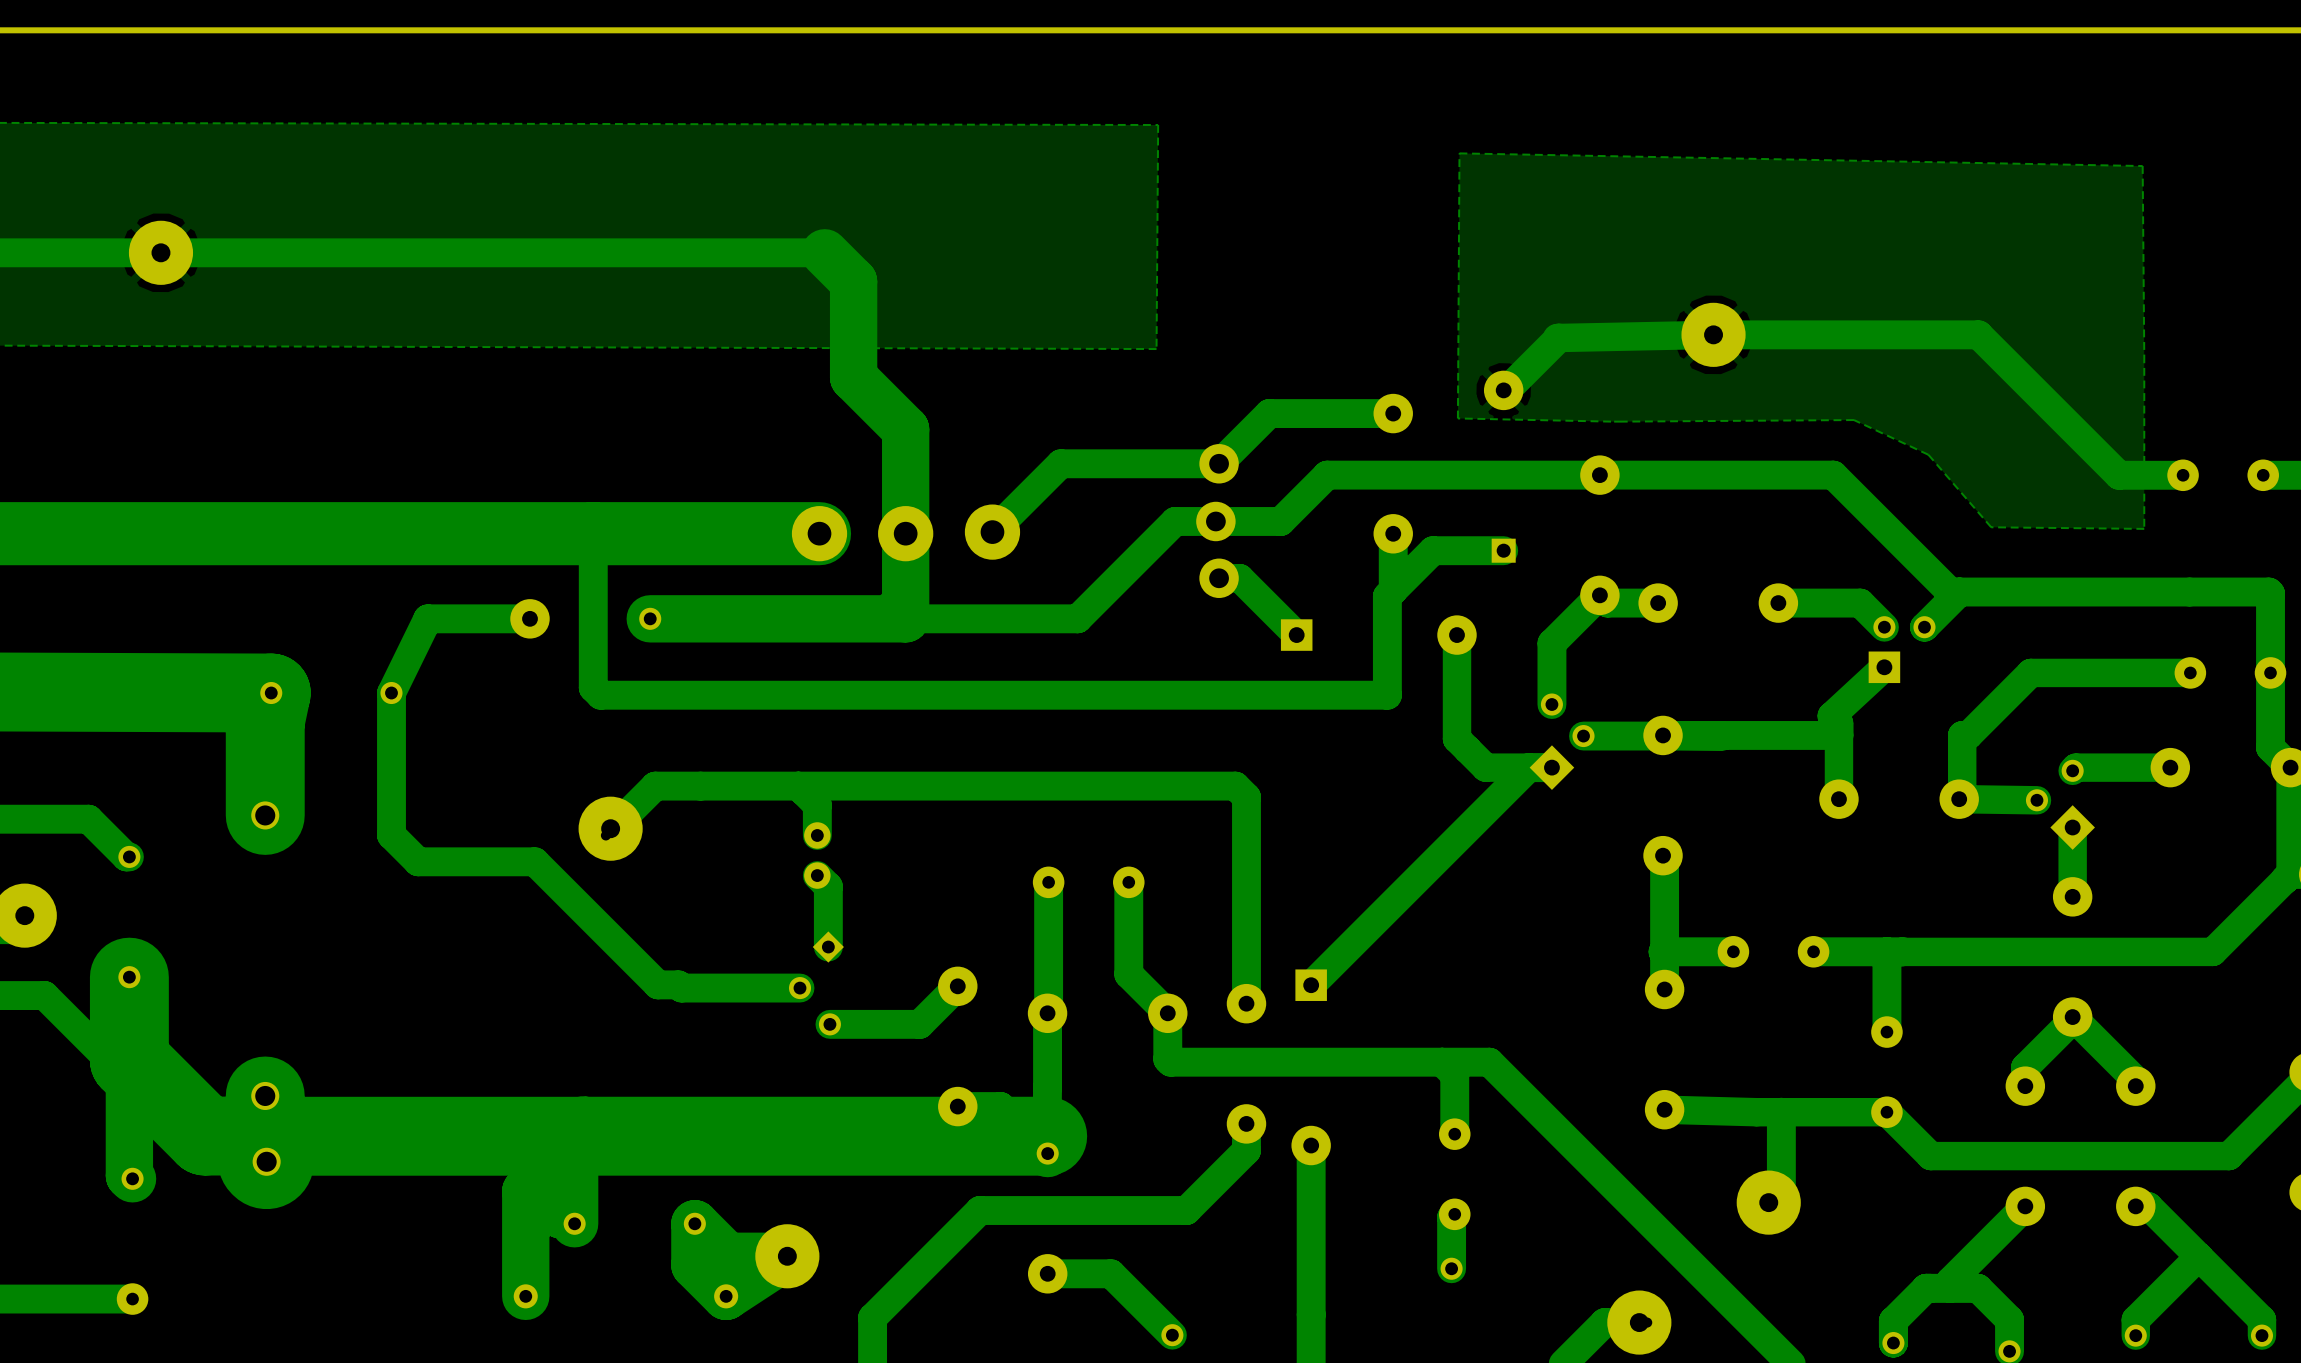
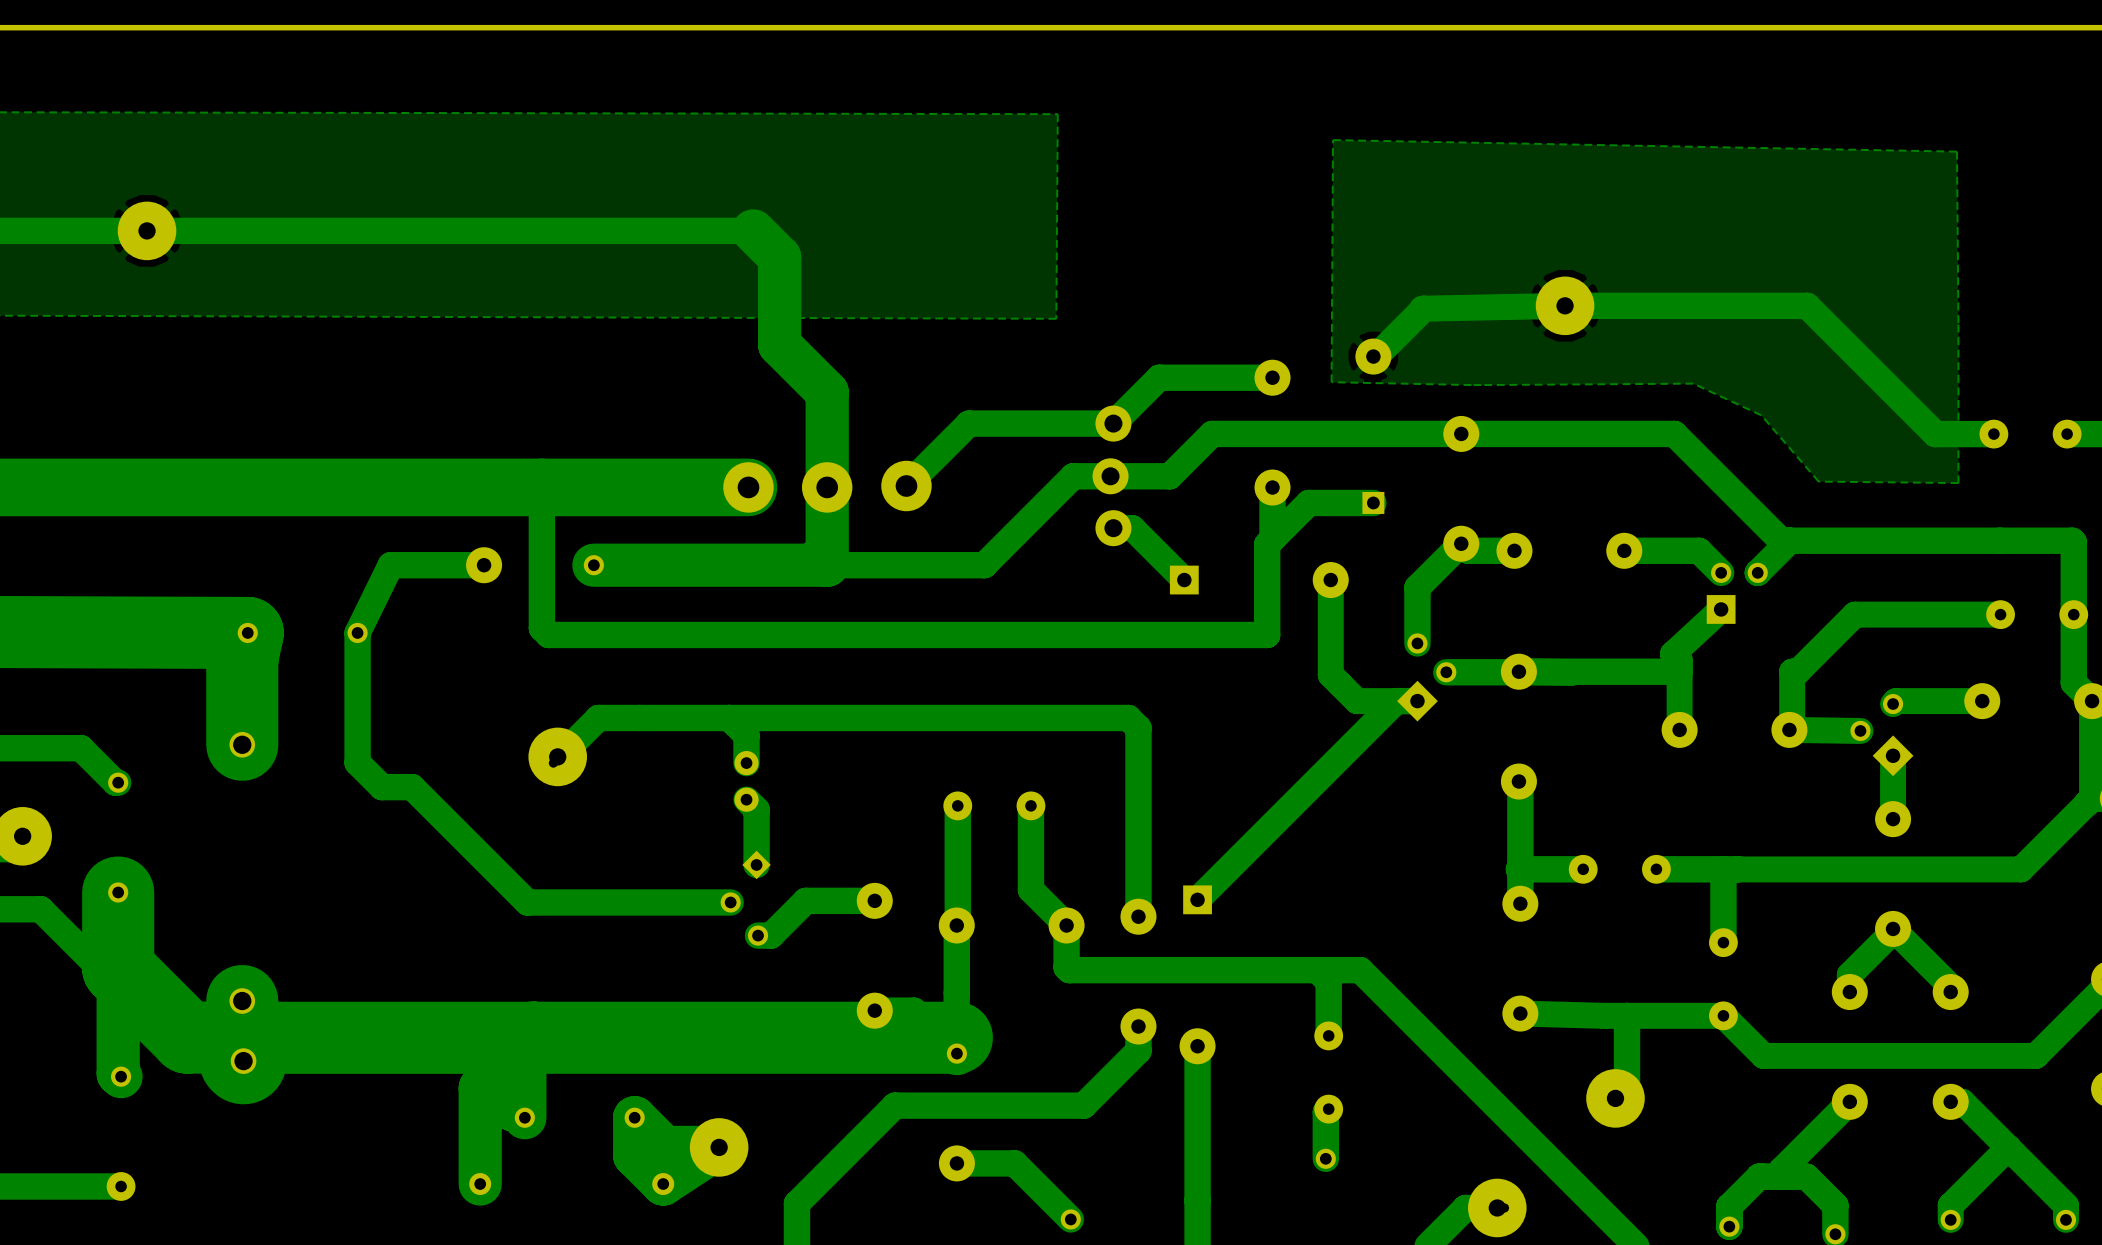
track: (451, 861) (534, 861) (657, 984) (678, 984) (681, 988) -> (412, 787) (527, 902) (622, 902)
track: (957, 986) (919, 1024) (844, 1024) -> (874, 900) (805, 900) (771, 935)

